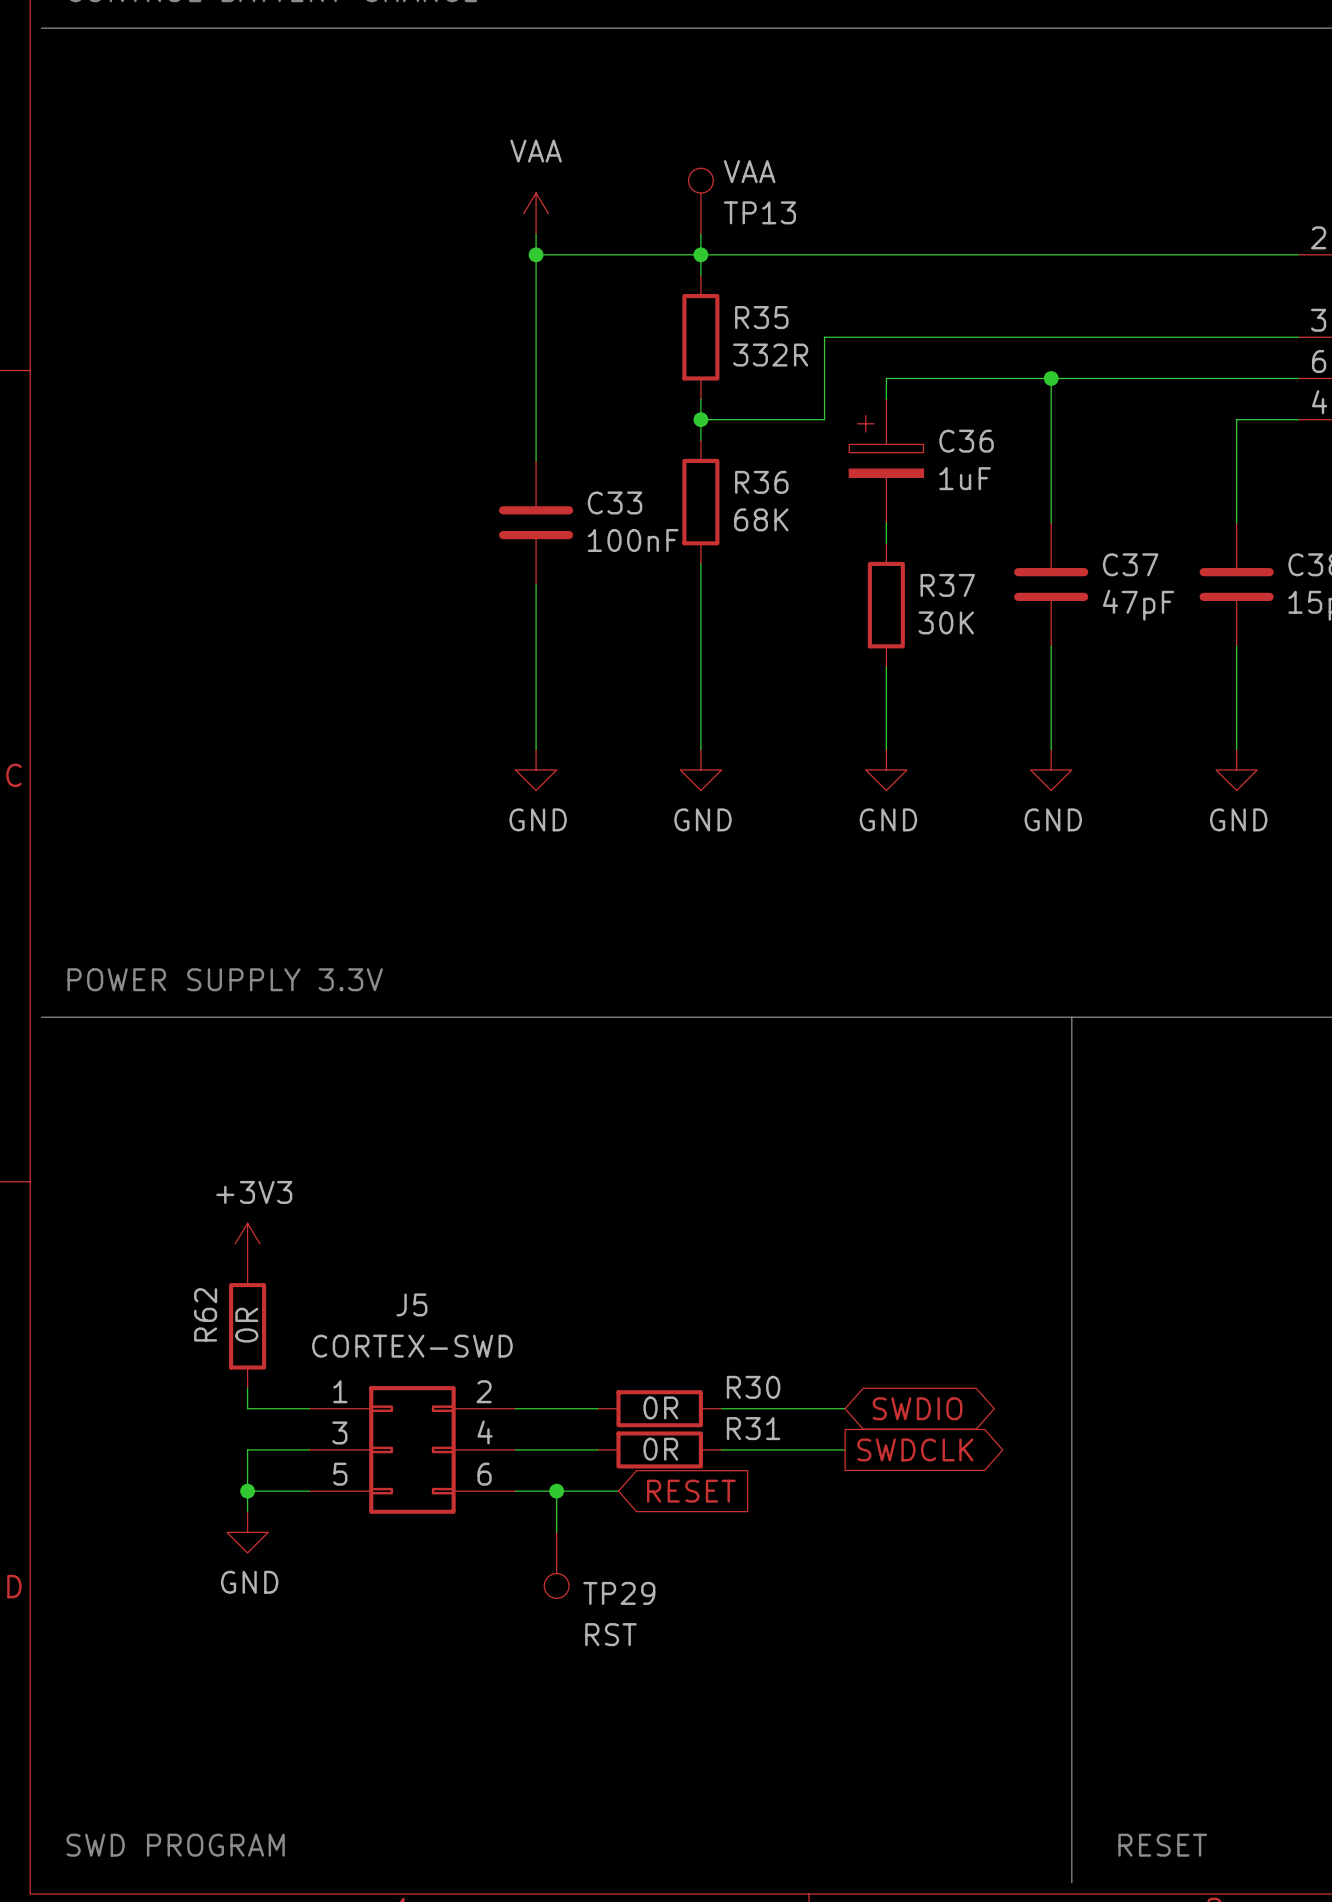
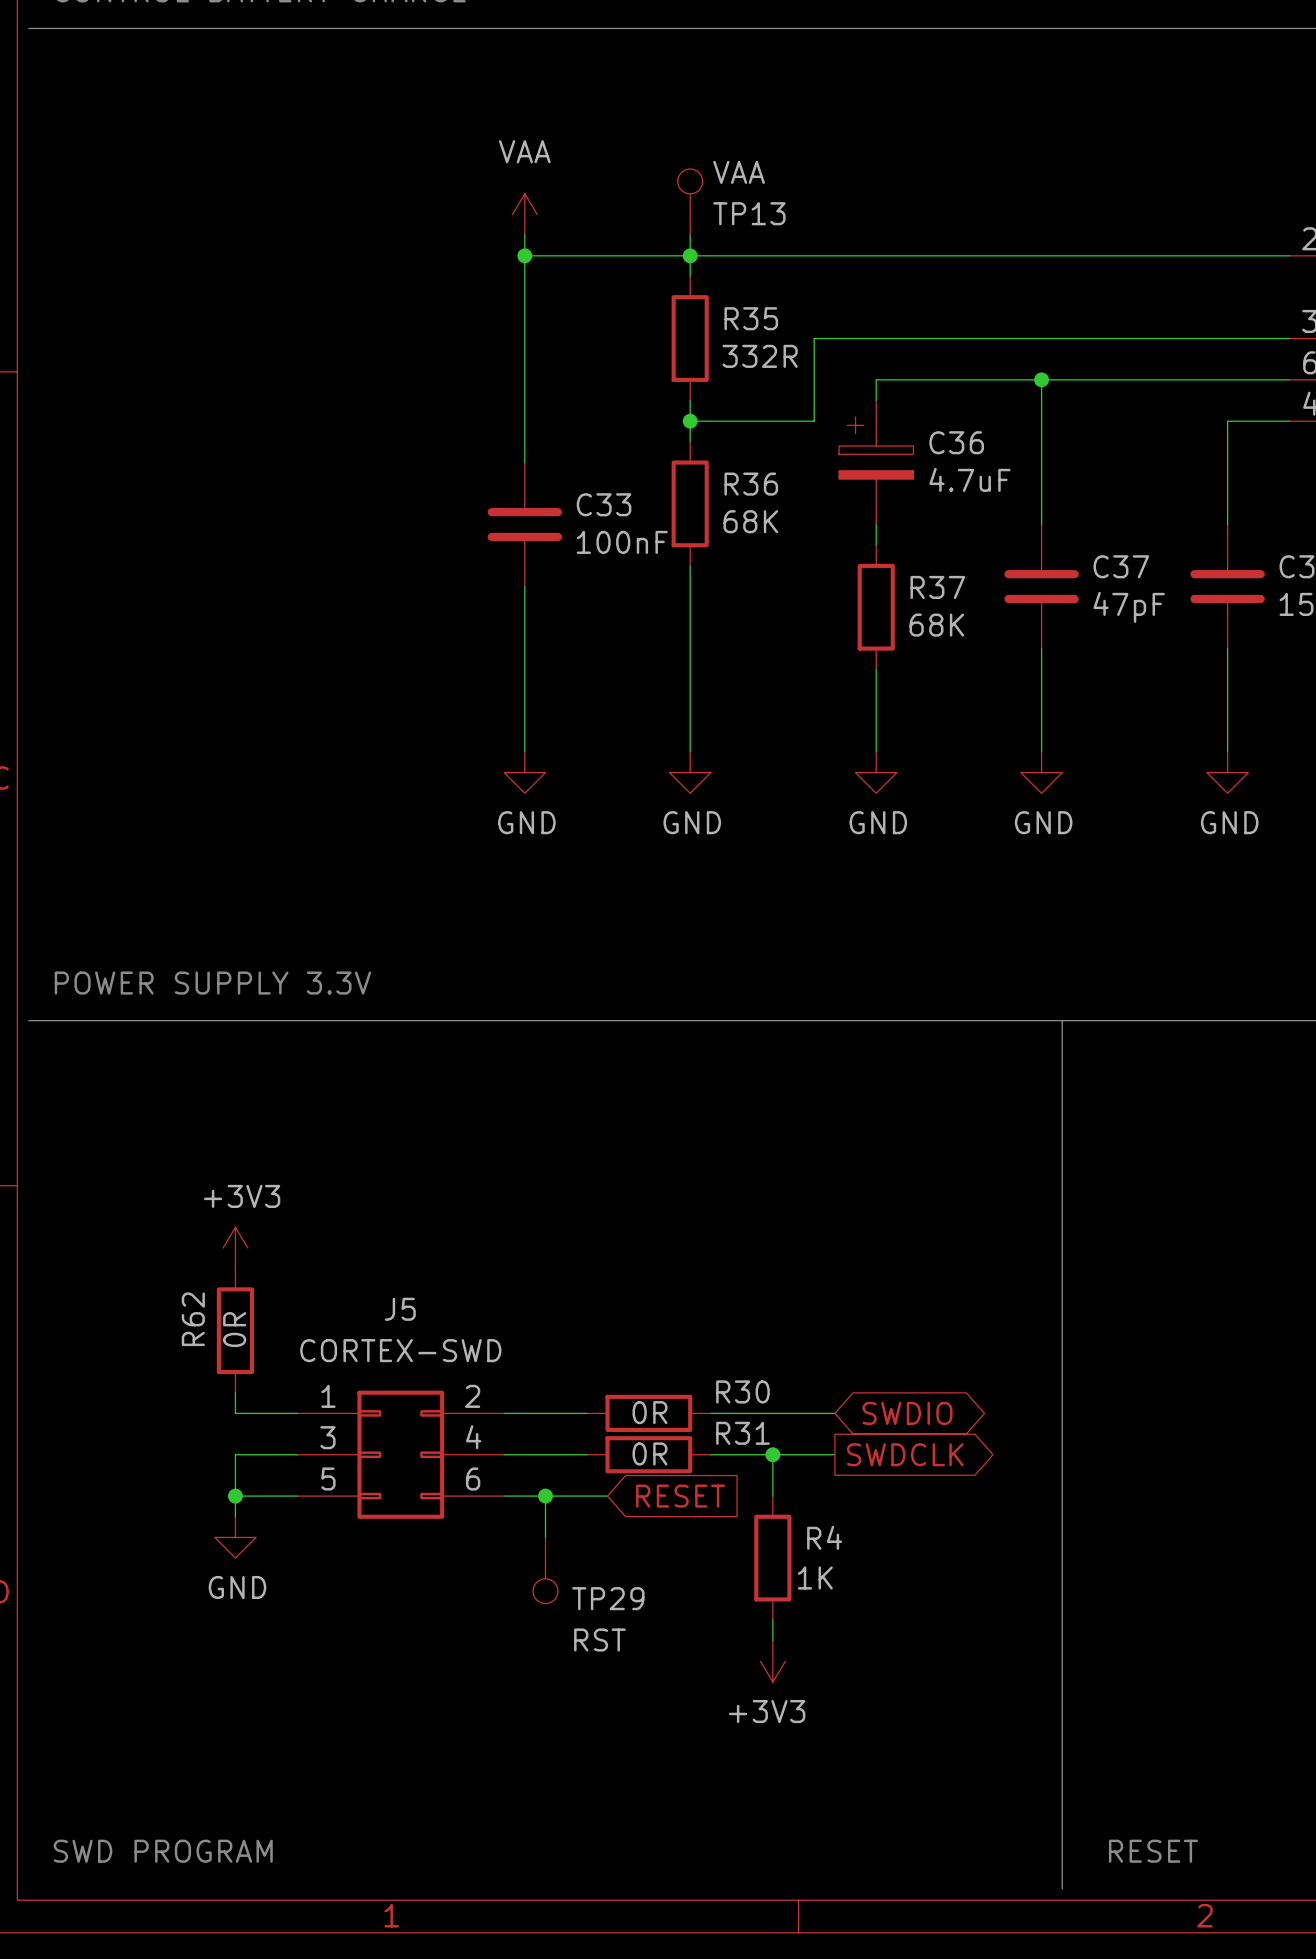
C36 value: 1uF (965, 478) -> 4.7uF (969, 479)
R37 value: 30K (946, 622) -> 68K (936, 625)
wire: none -> (772, 1454) (772, 1496)
junction: none -> (772, 1454)
R4: none -> 1K (772, 1558)
wire: none -> (772, 1620) (772, 1640)
power symbol: none -> +3V3 (772, 1661)

